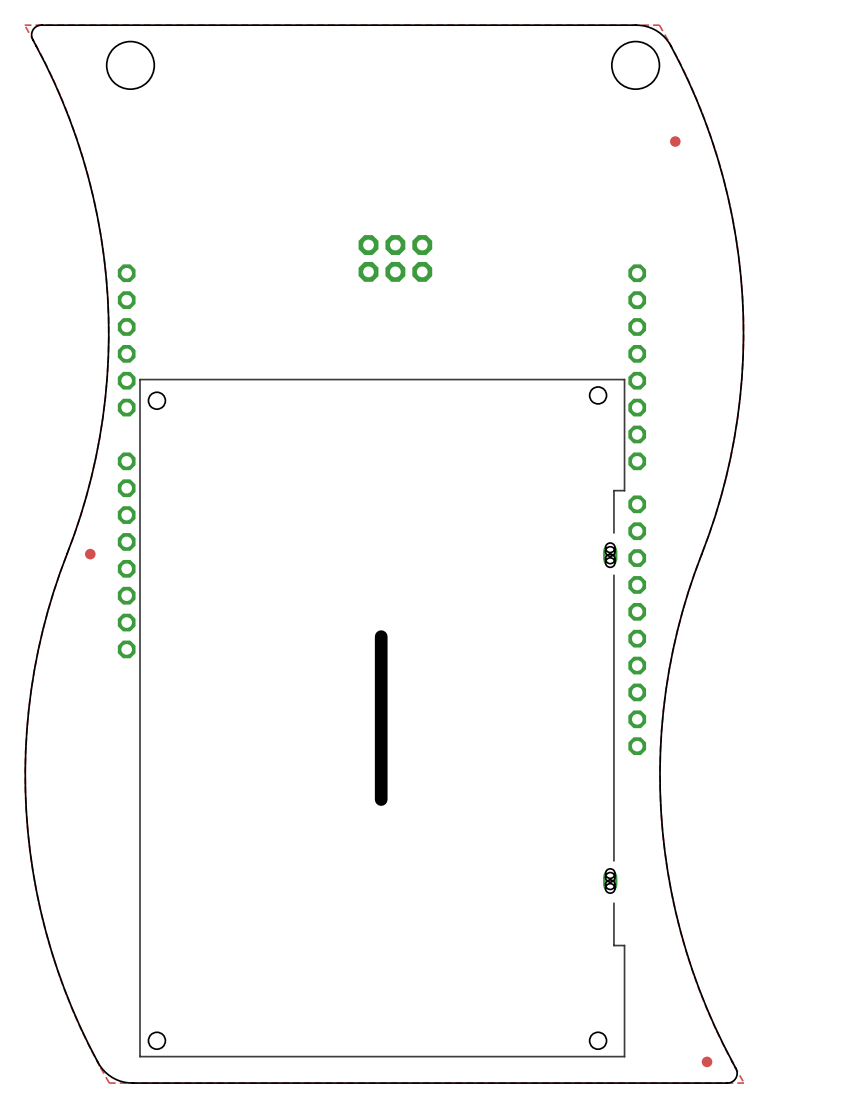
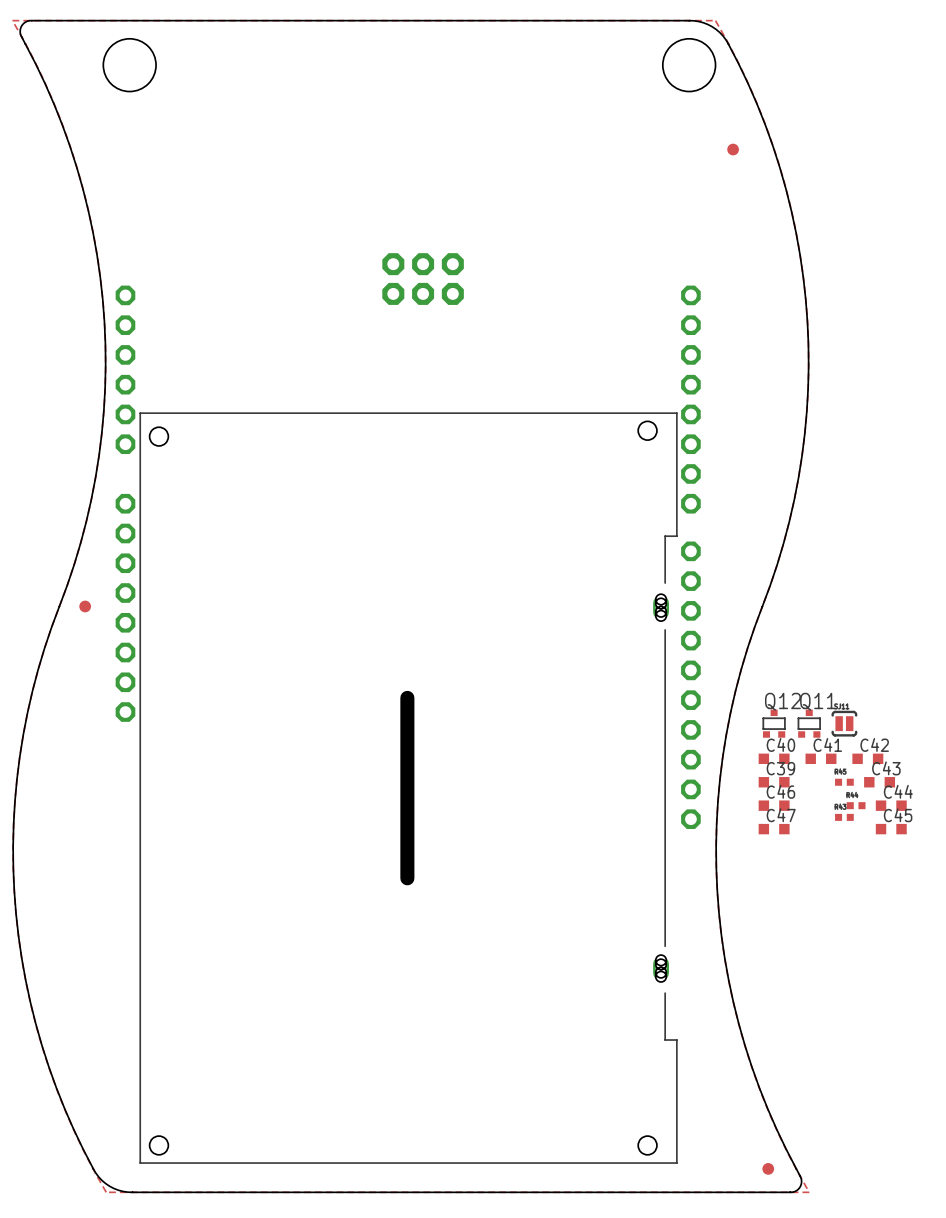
Q12: none -> (774, 723)
Q11: none -> (809, 723)
part: none -> (844, 723)
C40: none -> (774, 758)
C41: none -> (820, 758)
C42: none -> (867, 758)
C39: none -> (774, 782)
part: none -> (844, 782)
C43: none -> (879, 782)
C46: none -> (774, 805)
part: none -> (856, 805)
C44: none -> (891, 805)
part: none -> (844, 817)
C47: none -> (774, 829)
C45: none -> (891, 829)

